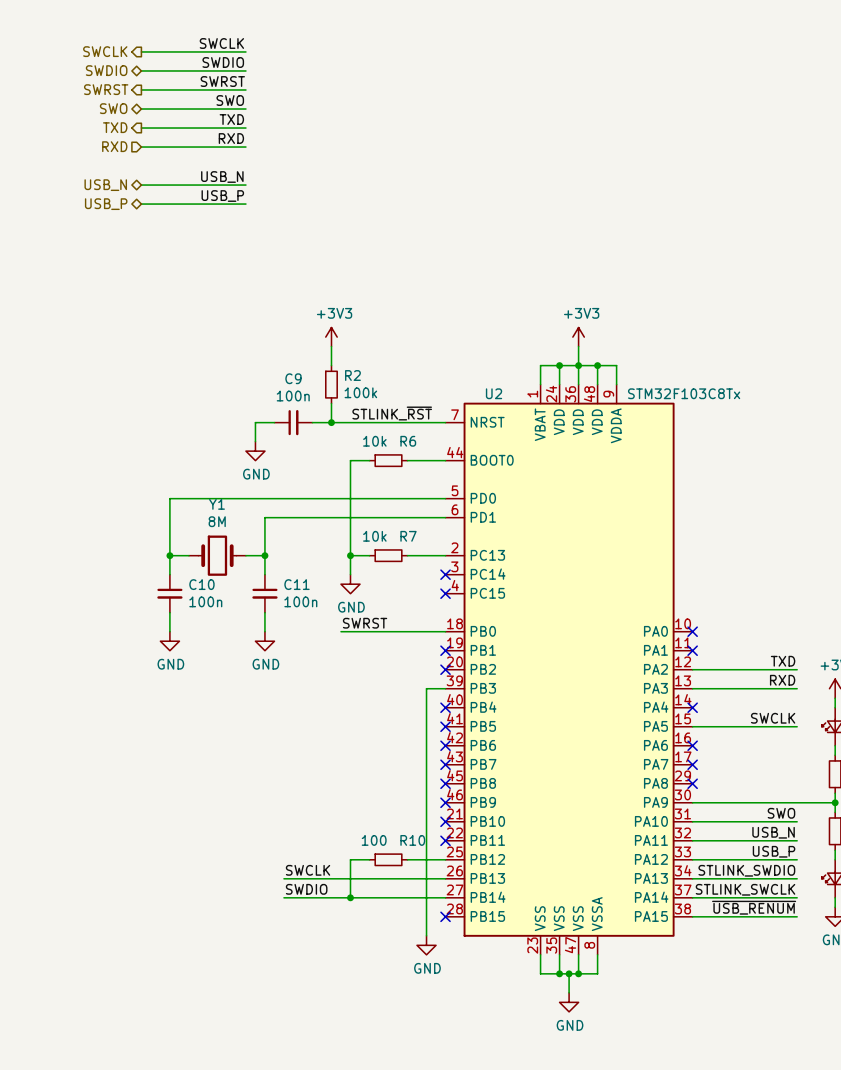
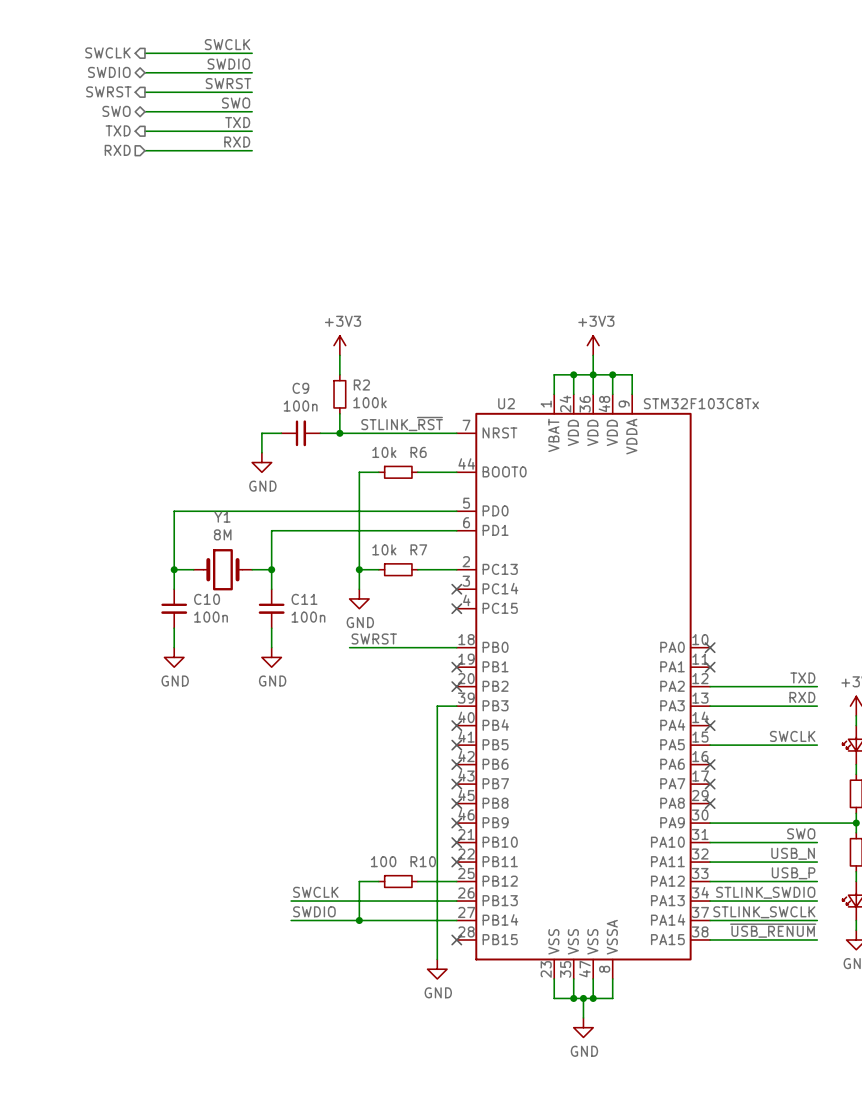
label: USB_N (222, 177) -> none
hierarchical label: USB_N (105, 185) -> none
wire: (141, 185) (245, 185) -> none
label: USB_P (222, 196) -> none
hierarchical label: USB_P (106, 204) -> none
wire: (141, 204) (245, 204) -> none

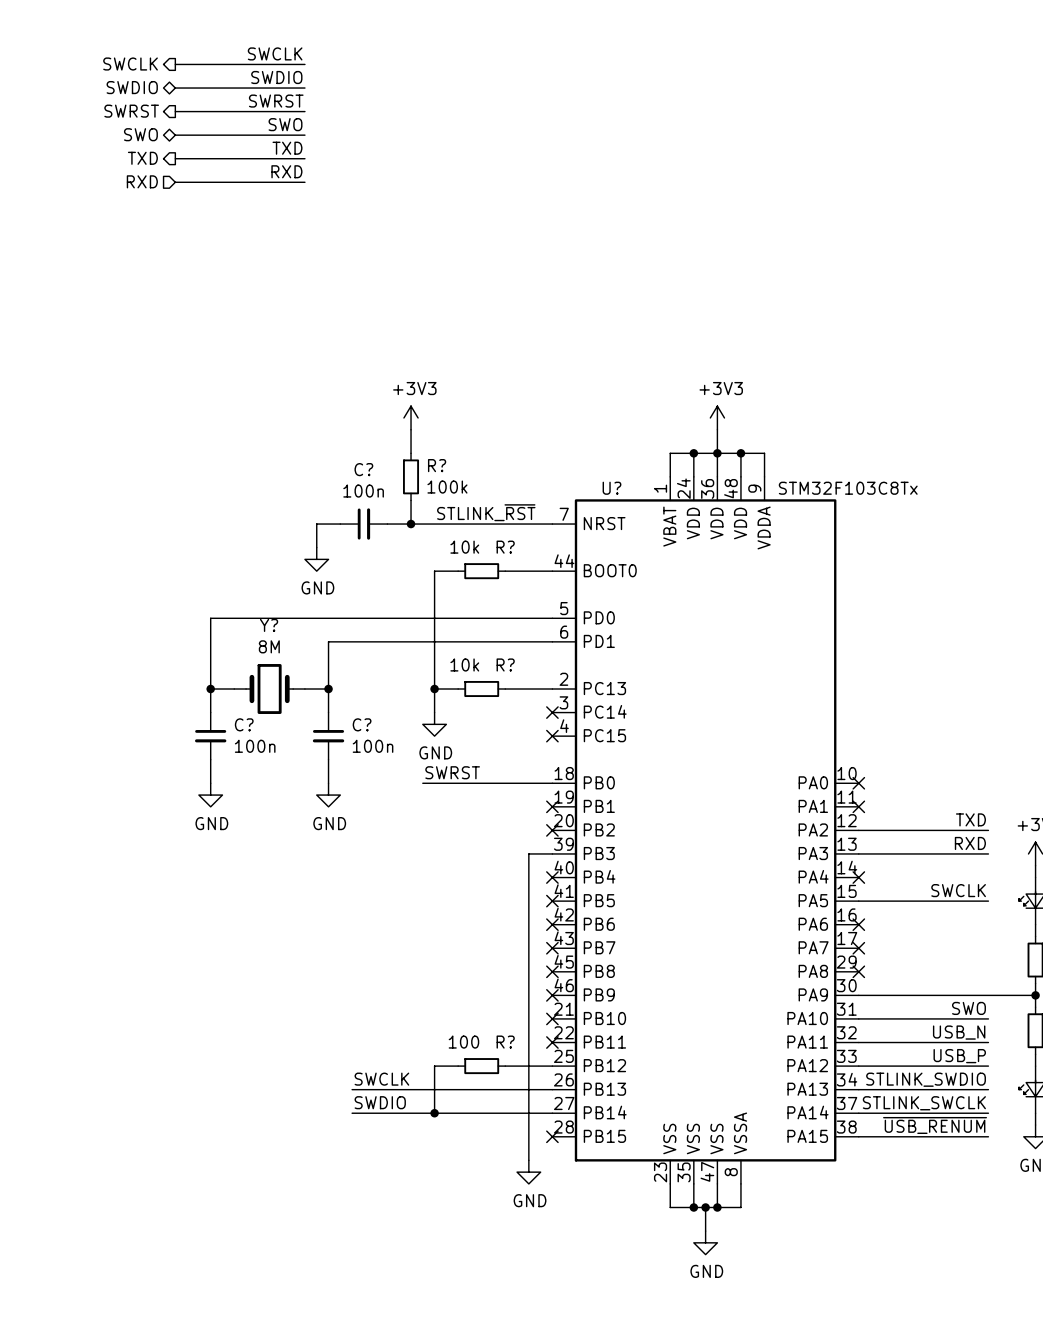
R2 name: R2 (361, 385) -> R? (437, 465)
C9 name: C9 (300, 388) -> C? (363, 469)
U2 name: U2 (506, 403) -> U? (611, 488)
R6 name: R6 (418, 452) -> R? (505, 547)
Y1 name: Y1 (222, 517) -> Y? (269, 625)
R7 name: R7 (418, 549) -> R? (505, 664)
C10 name: C10 (207, 599) -> C? (244, 724)
C11 name: C11 (304, 599) -> C? (362, 724)
R10 name: R10 (423, 861) -> R? (505, 1042)

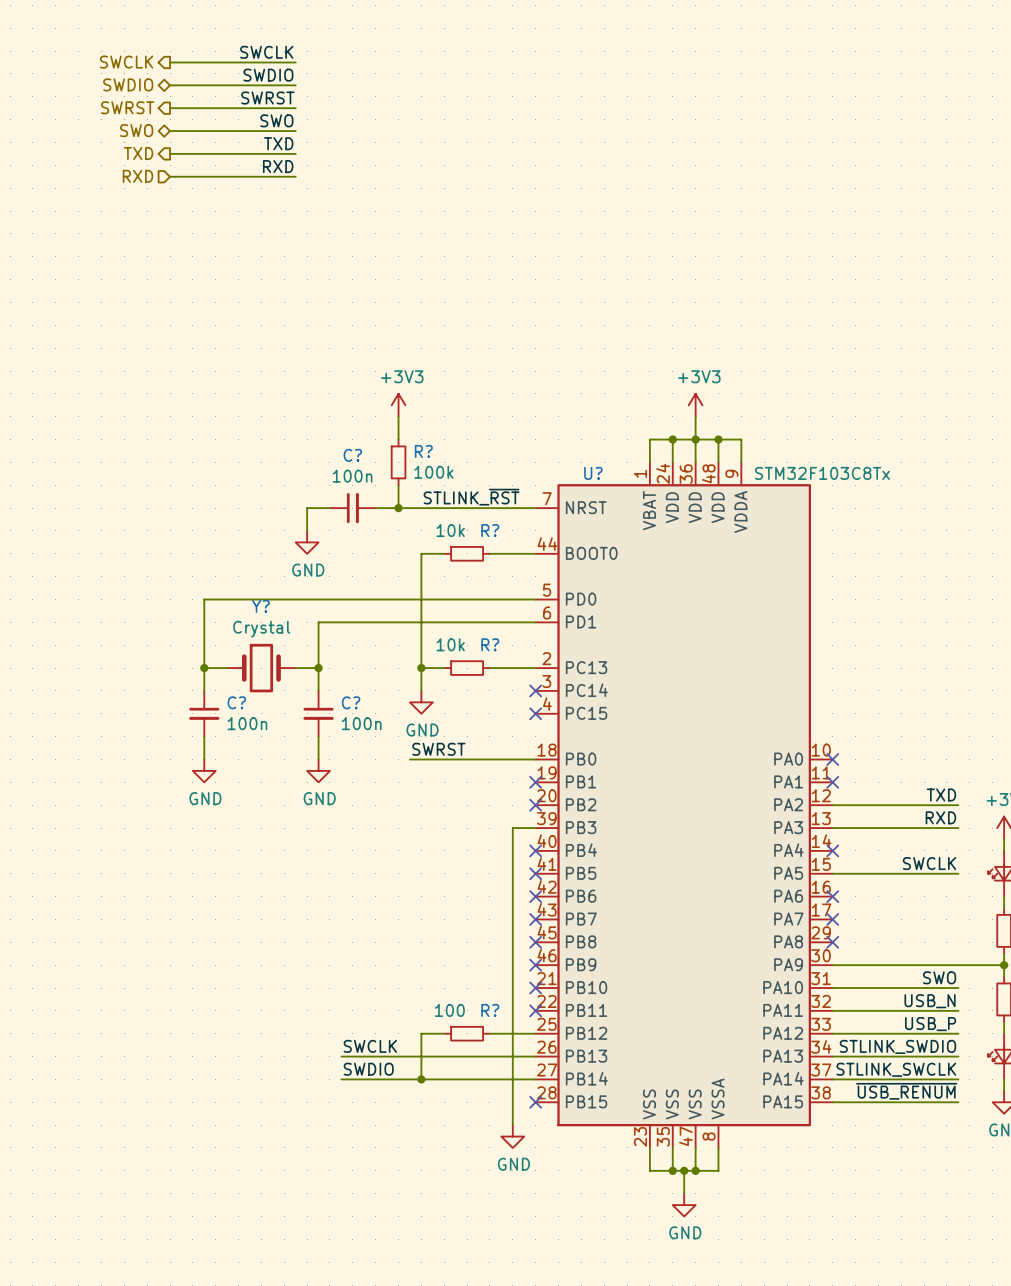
Y? value: 8M (269, 646) -> Crystal (261, 629)

